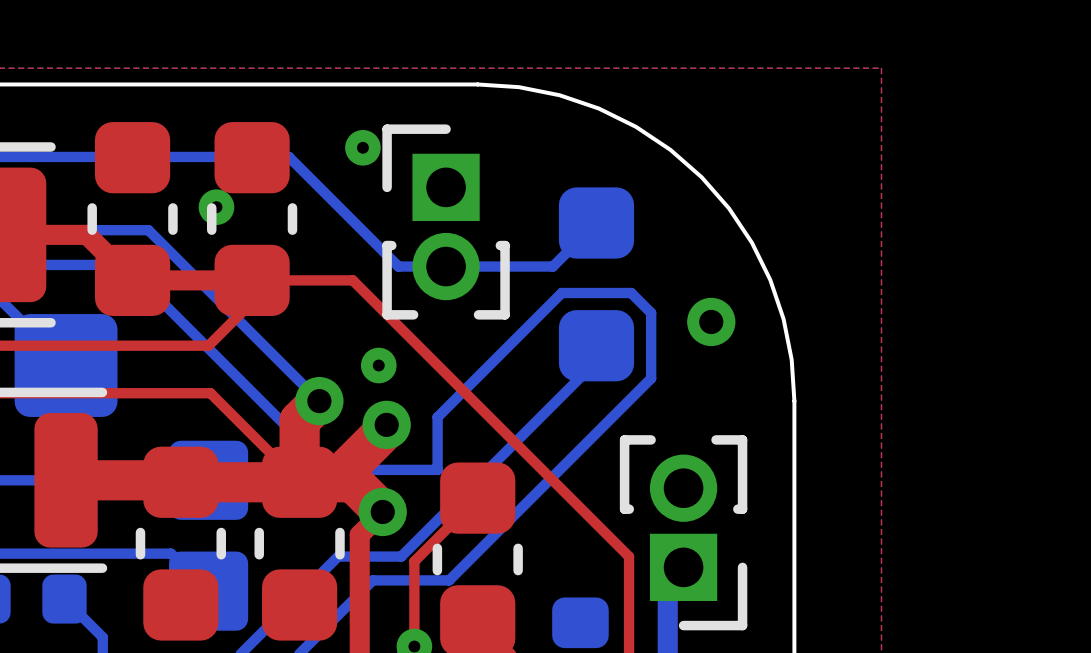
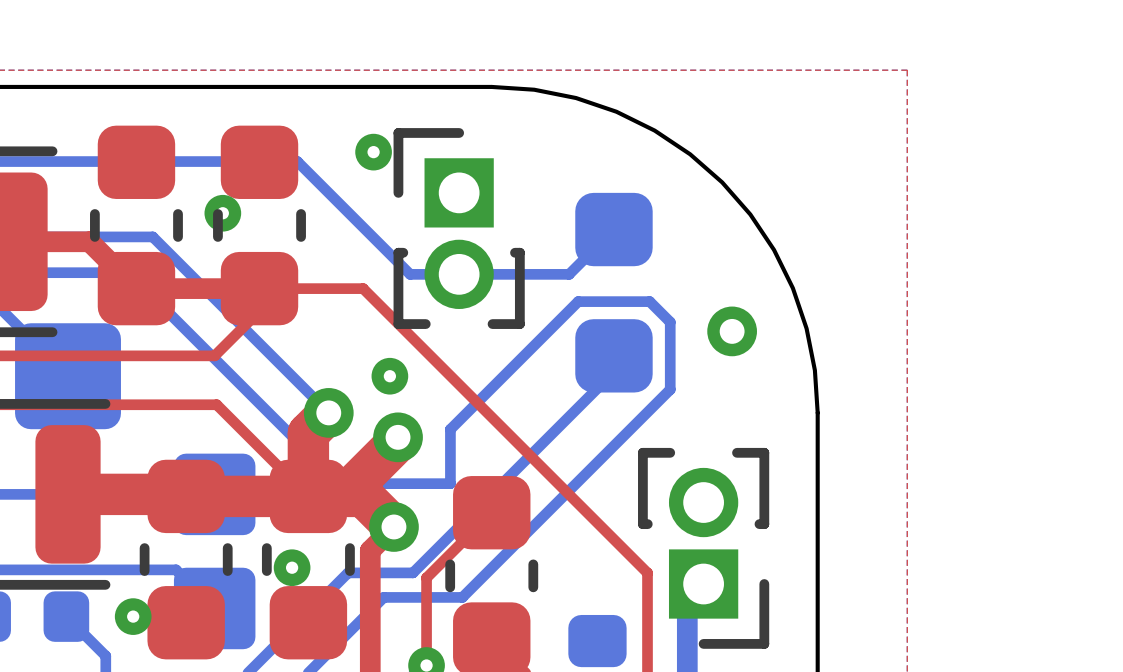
via: none -> (292, 567)
via: none -> (133, 616)

